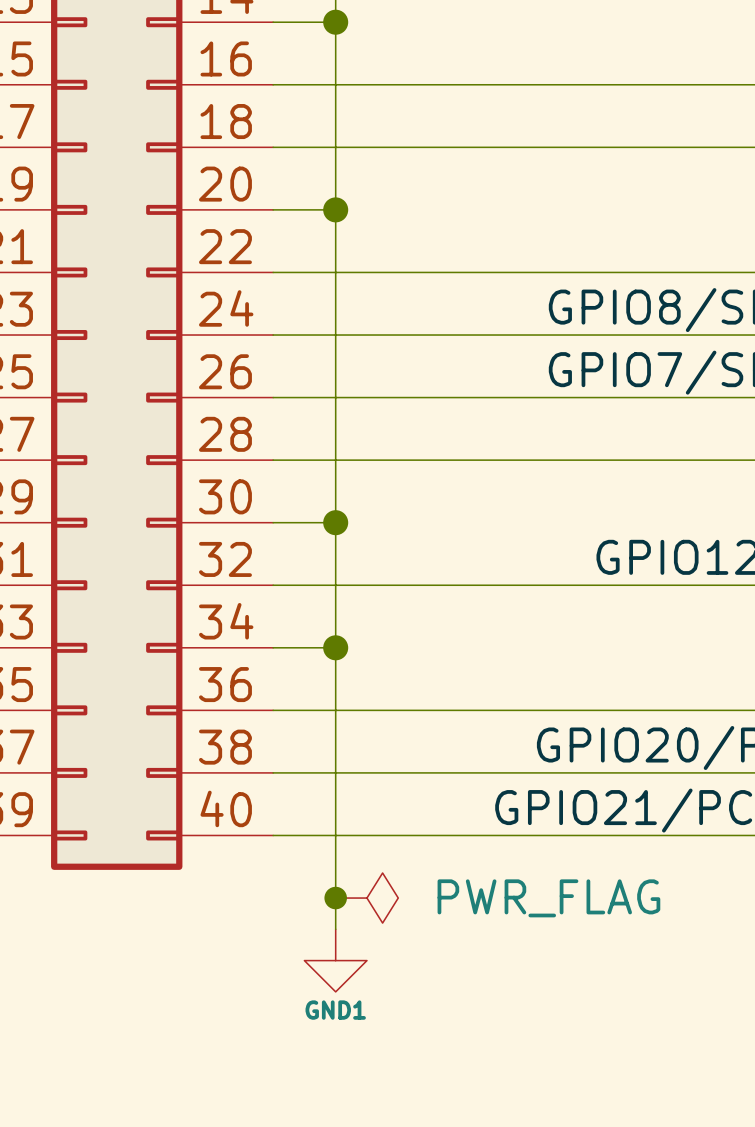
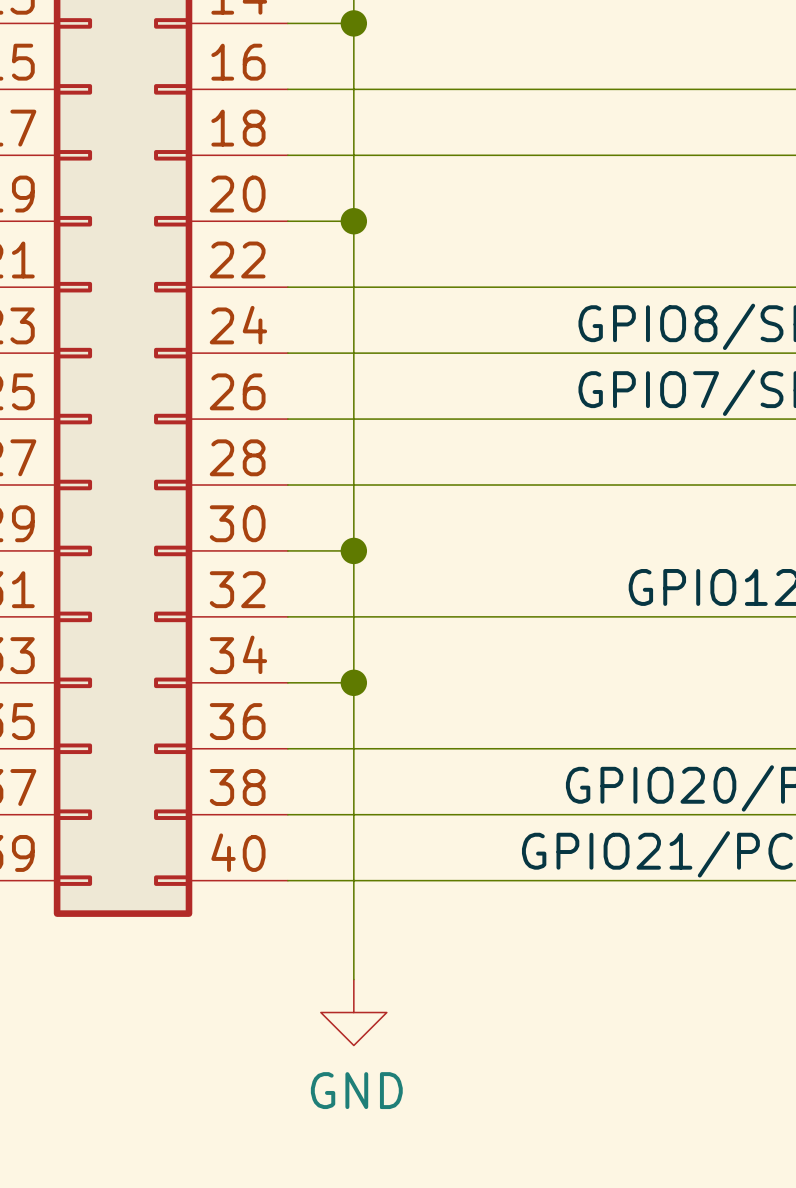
junction: (335, 898) -> none
power symbol: PWR_FLAG (366, 898) -> none
power symbol: GND1 (335, 960) -> GND (353, 1012)

